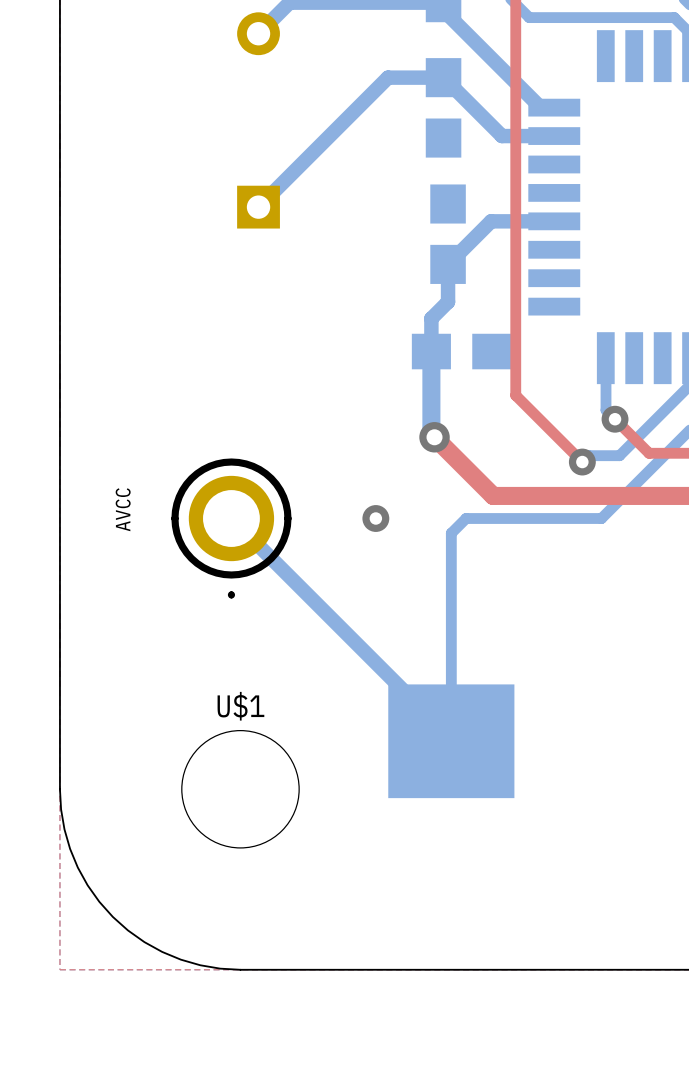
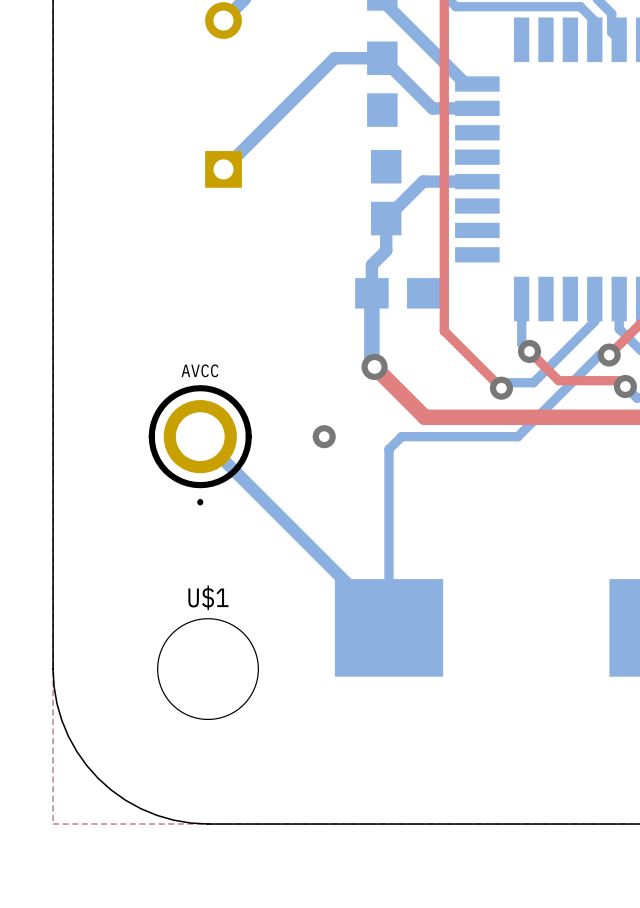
AVCC name rotation: 0° (123, 509) -> 90° clockwise (200, 370)
AVCC name position: AVCC (123, 509) -> AVCC (200, 370)

